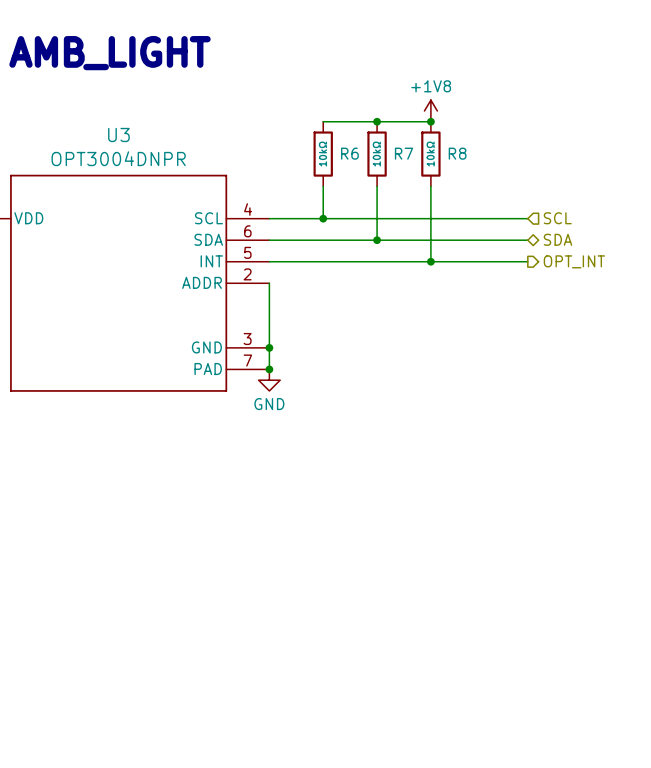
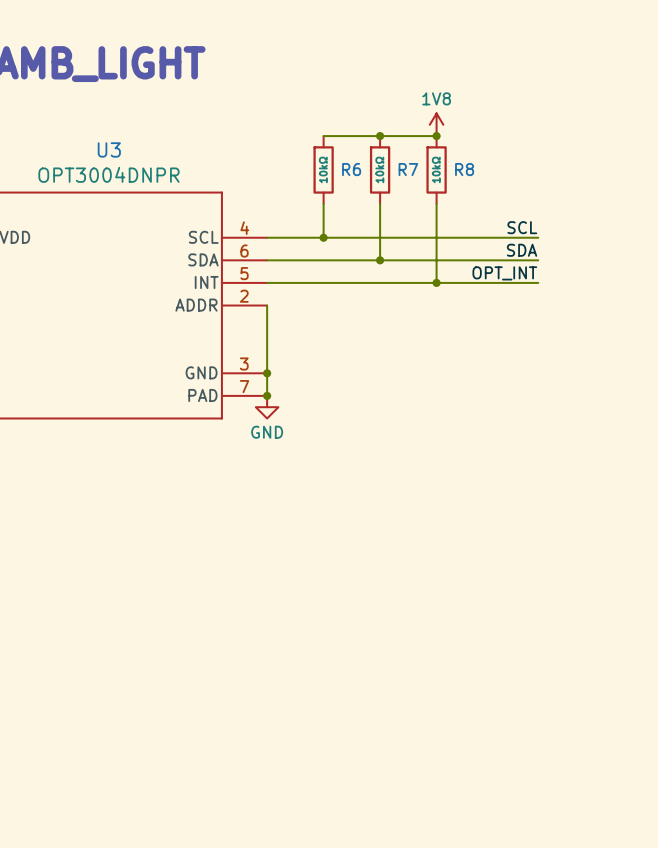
power symbol: +1V8 (430, 110) -> 1V8 (436, 124)
label: none -> SCL (522, 227)
hierarchical label: SCL (557, 218) -> none
label: none -> SDA (522, 250)
hierarchical label: SDA (557, 239) -> none
label: none -> OPT_INT (504, 273)
hierarchical label: OPT_INT (574, 261) -> none

